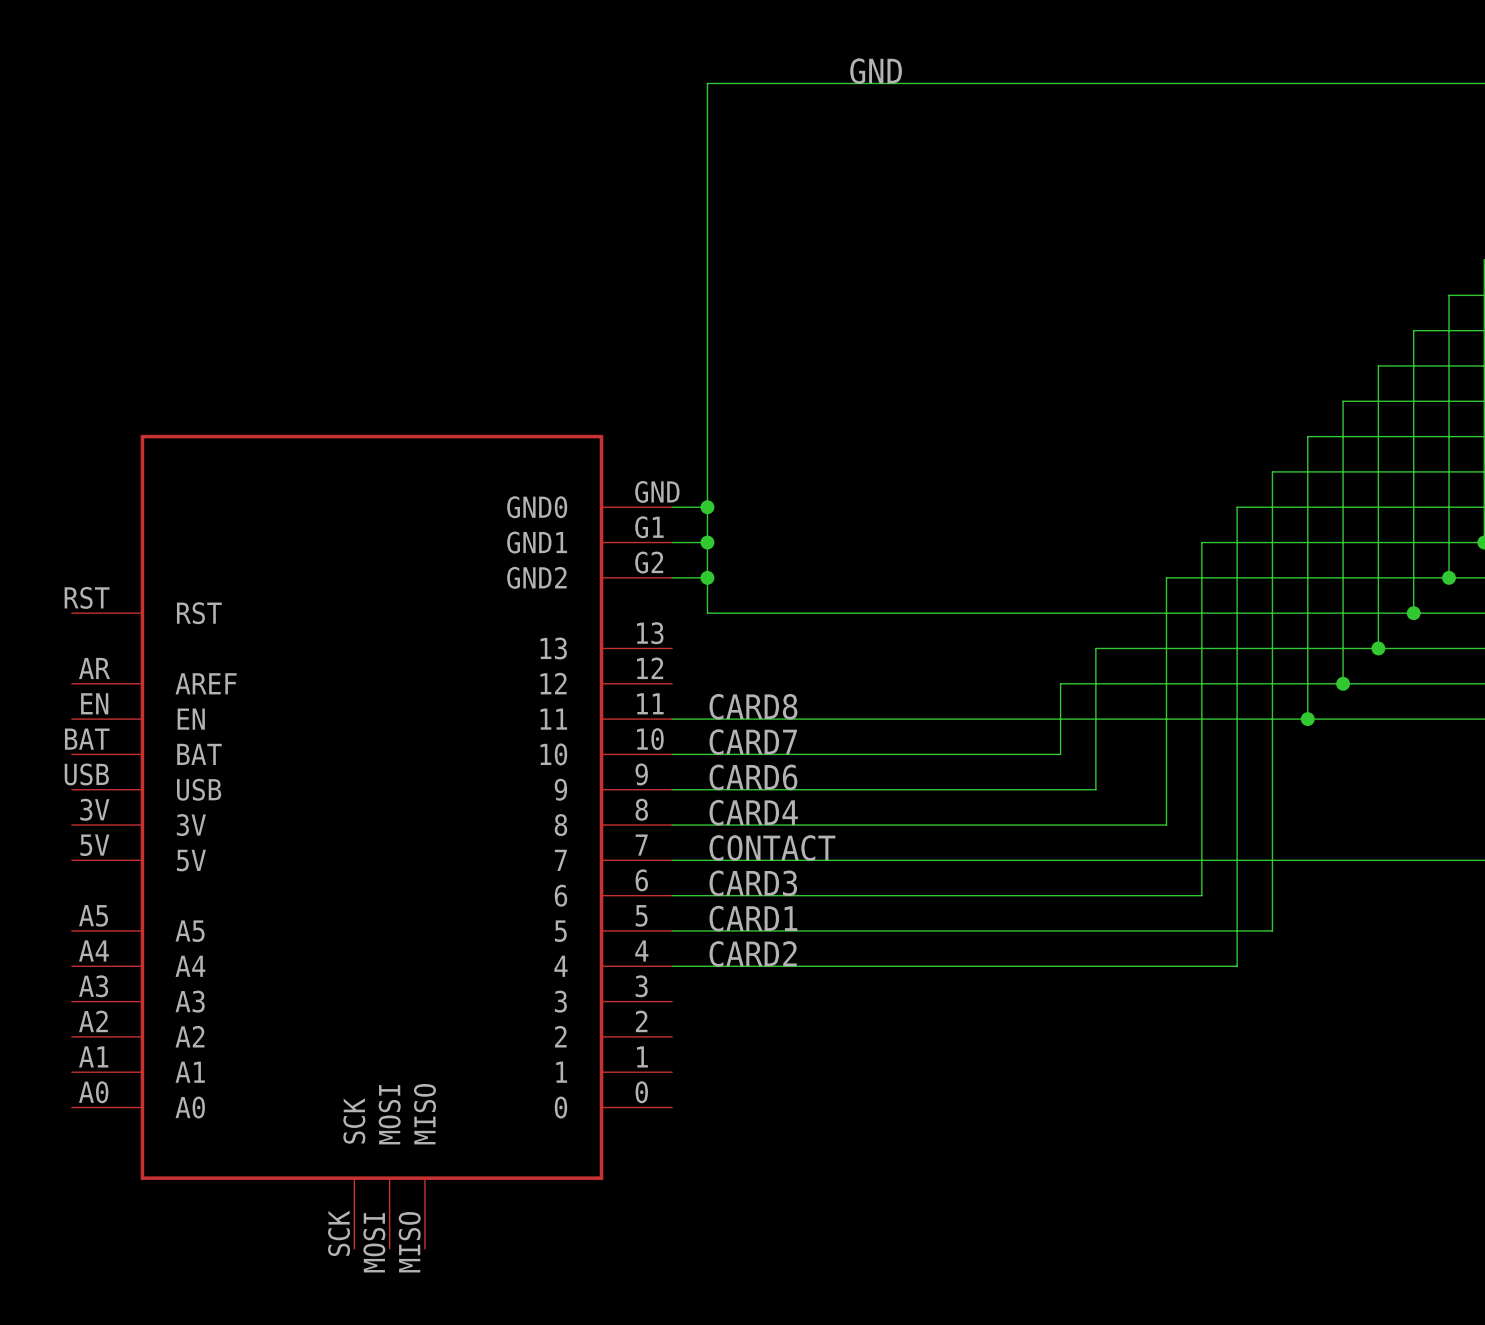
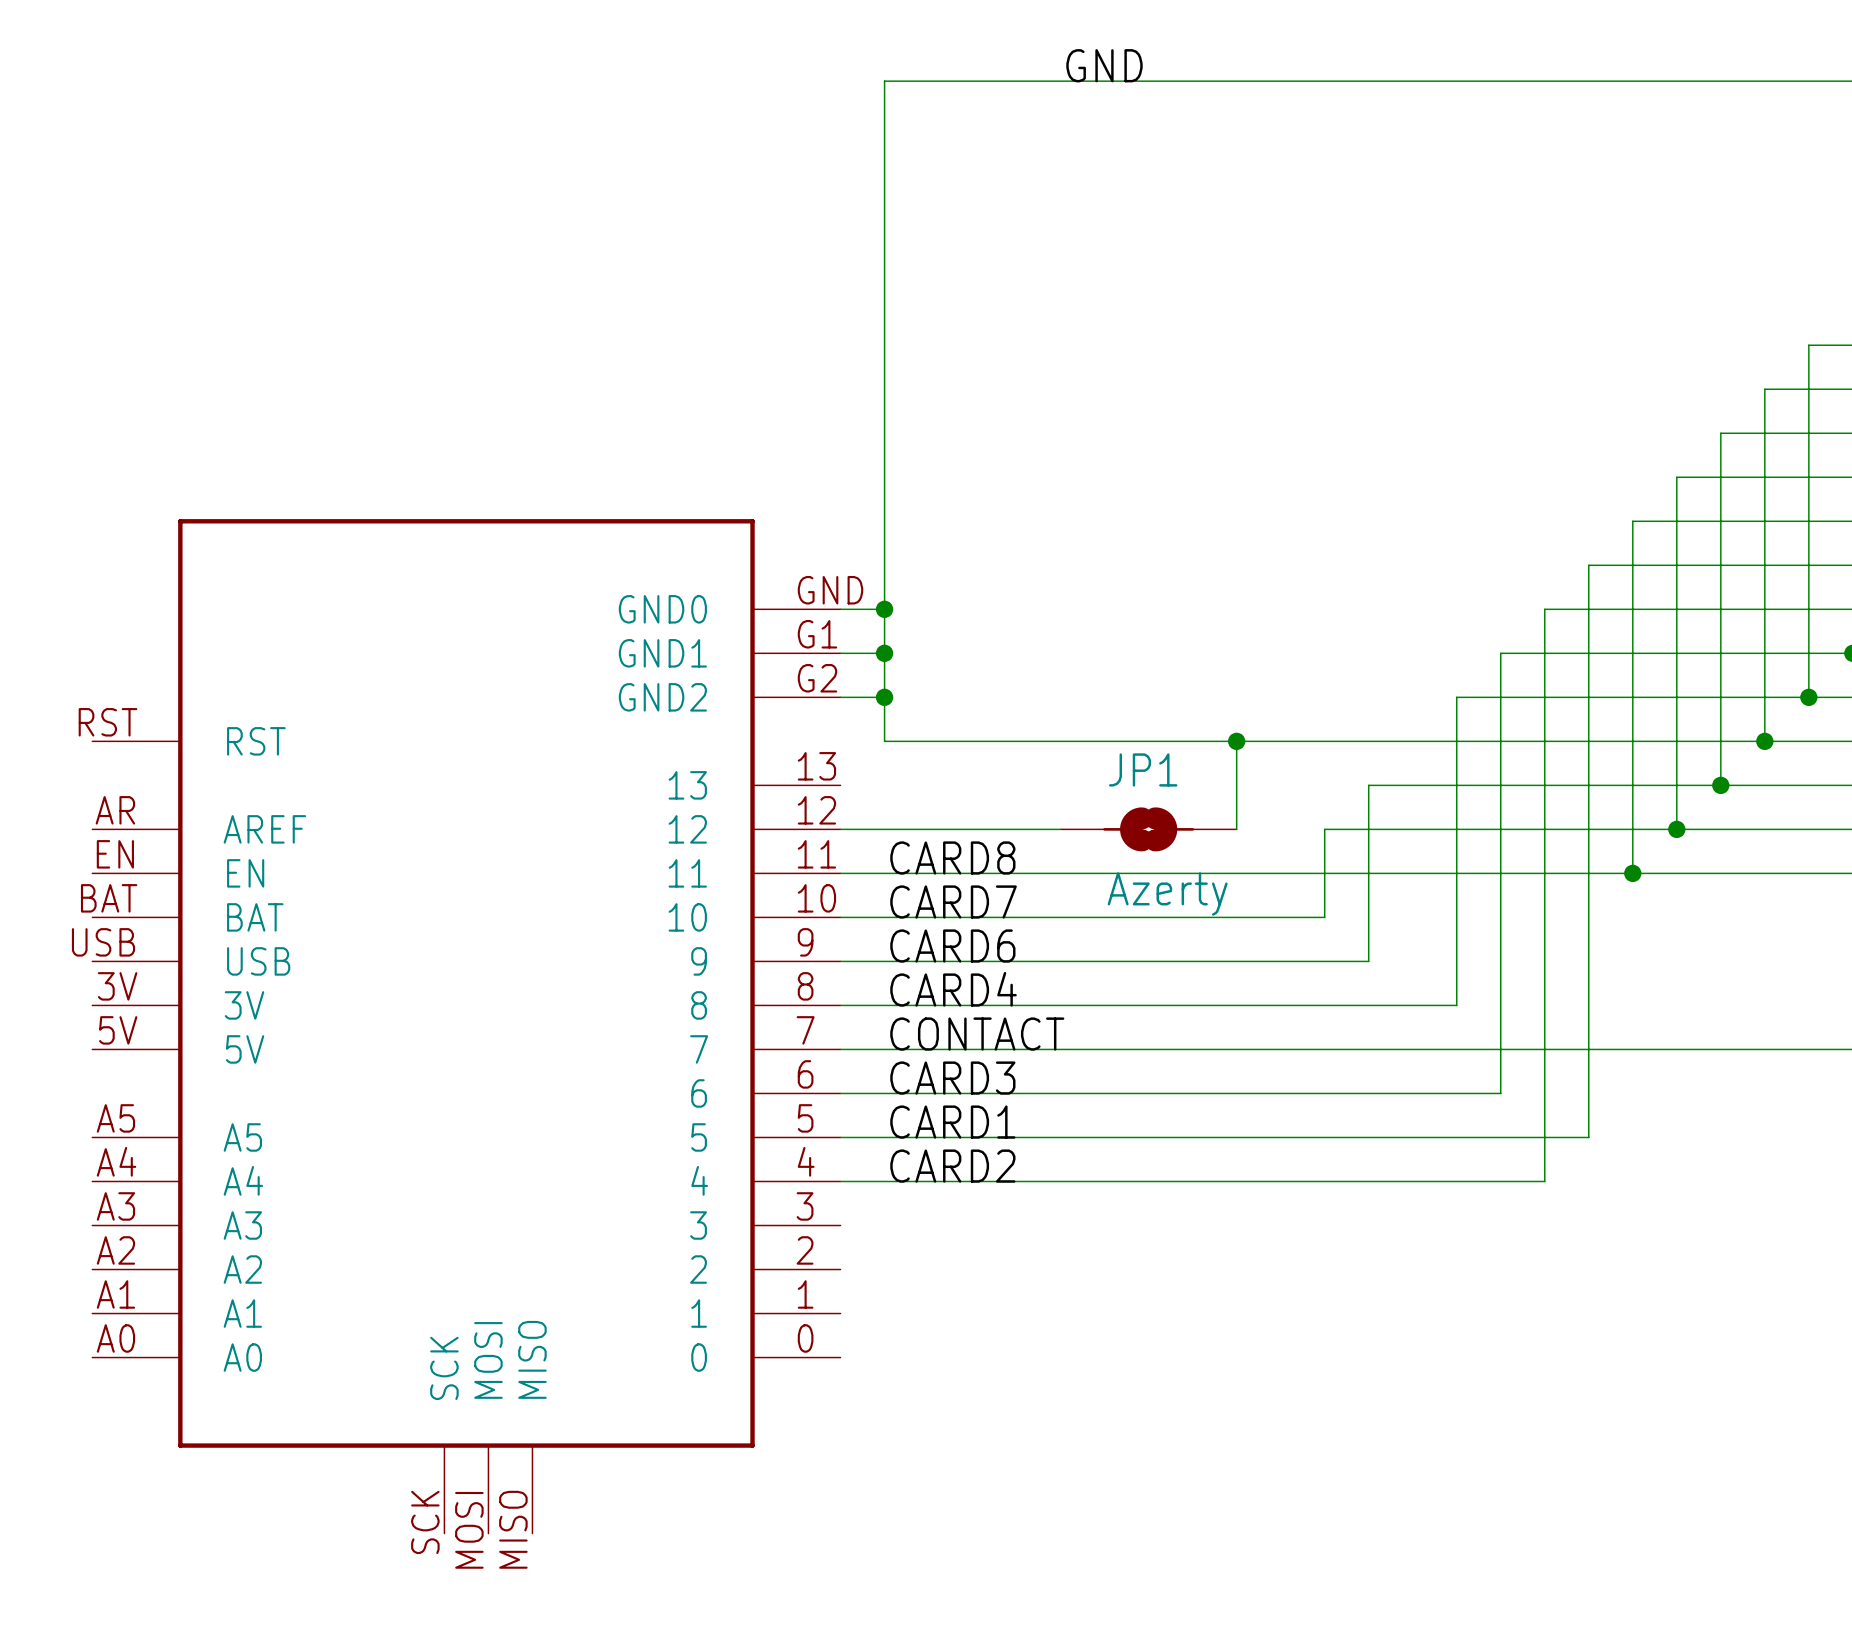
wire: none -> (1236, 741) (1236, 829)
junction: none -> (1236, 741)
wire: none -> (840, 829) (1060, 829)
JP1: none -> Azerty (1148, 829)

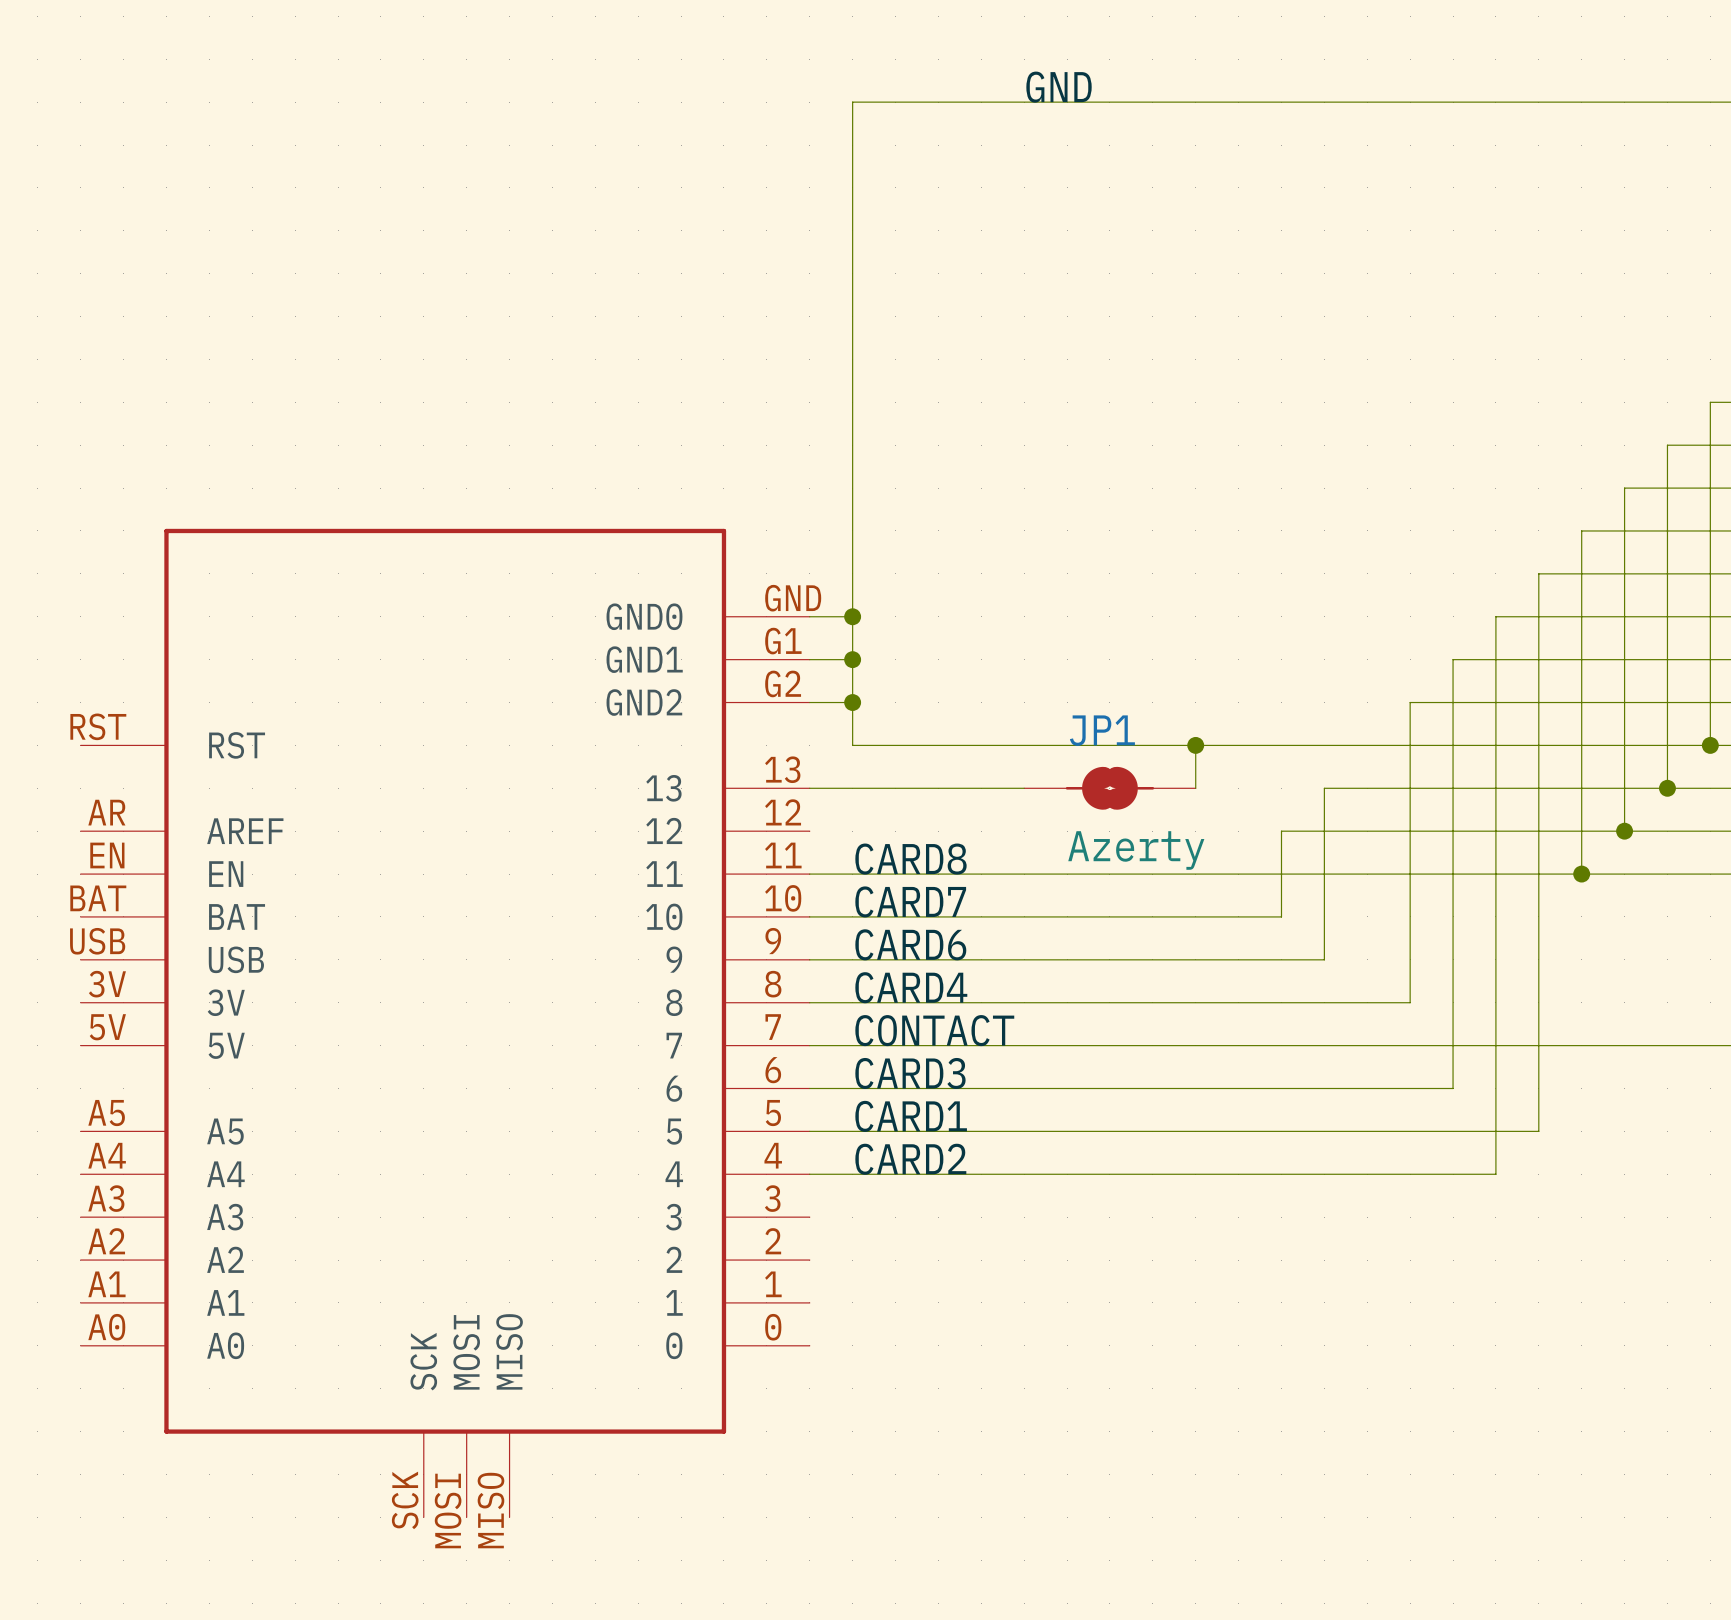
wire: (1236, 785) (1236, 829) -> none
wire: (840, 829) (1060, 829) -> (809, 788) (1024, 788)
JP1 position: (1148, 829) -> (1109, 788)

